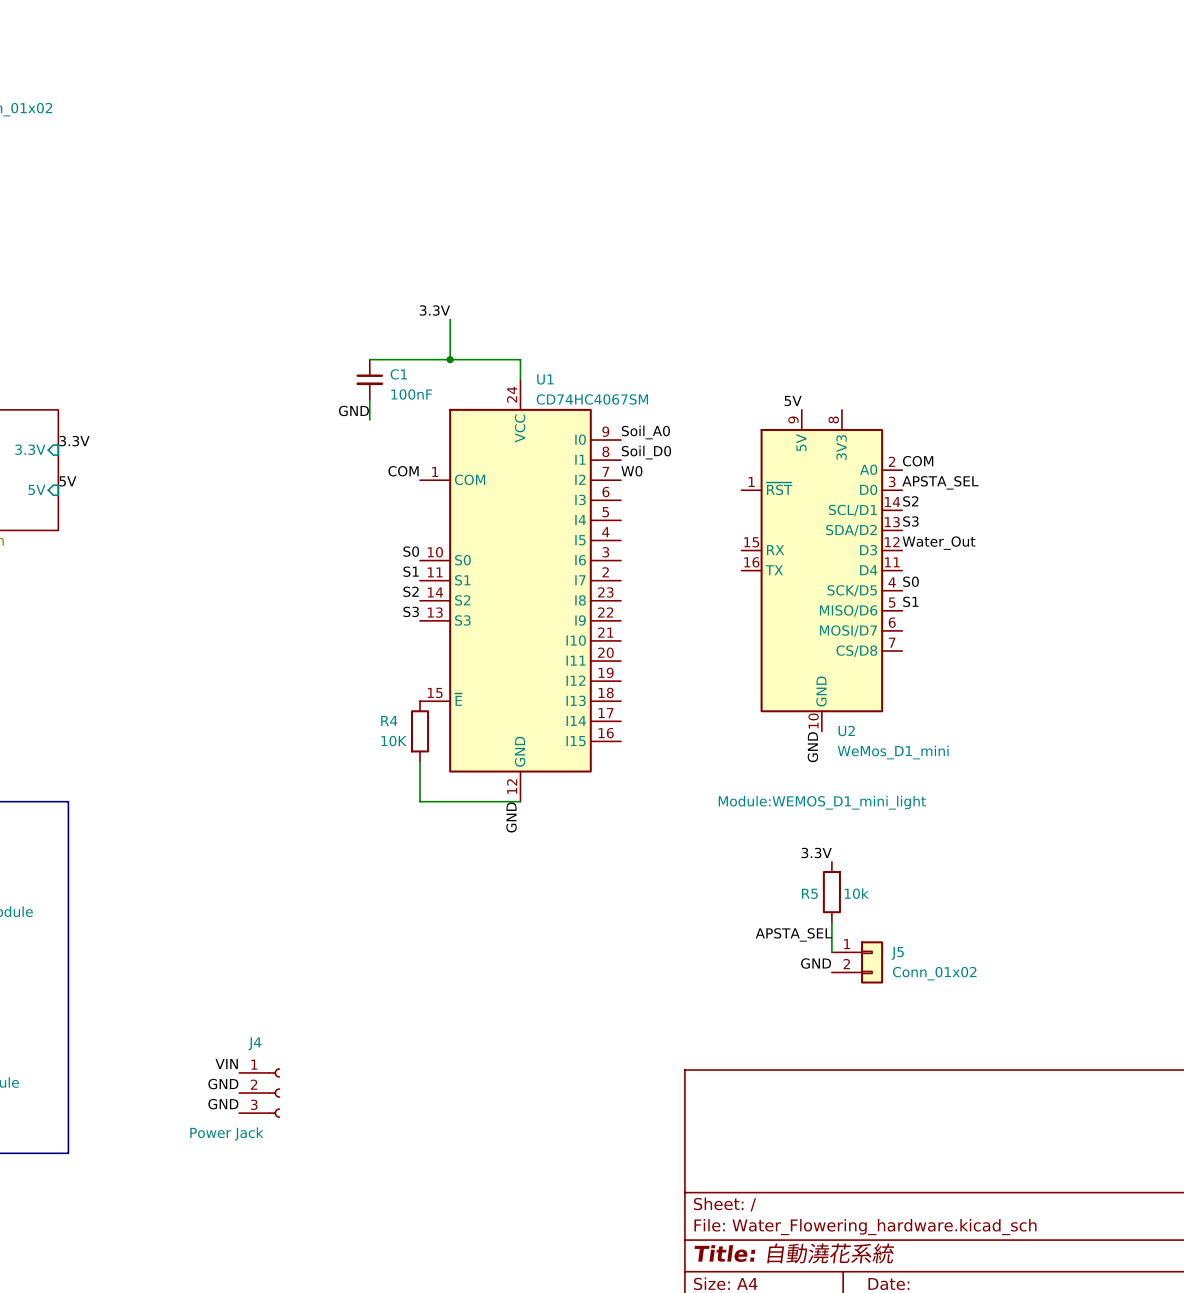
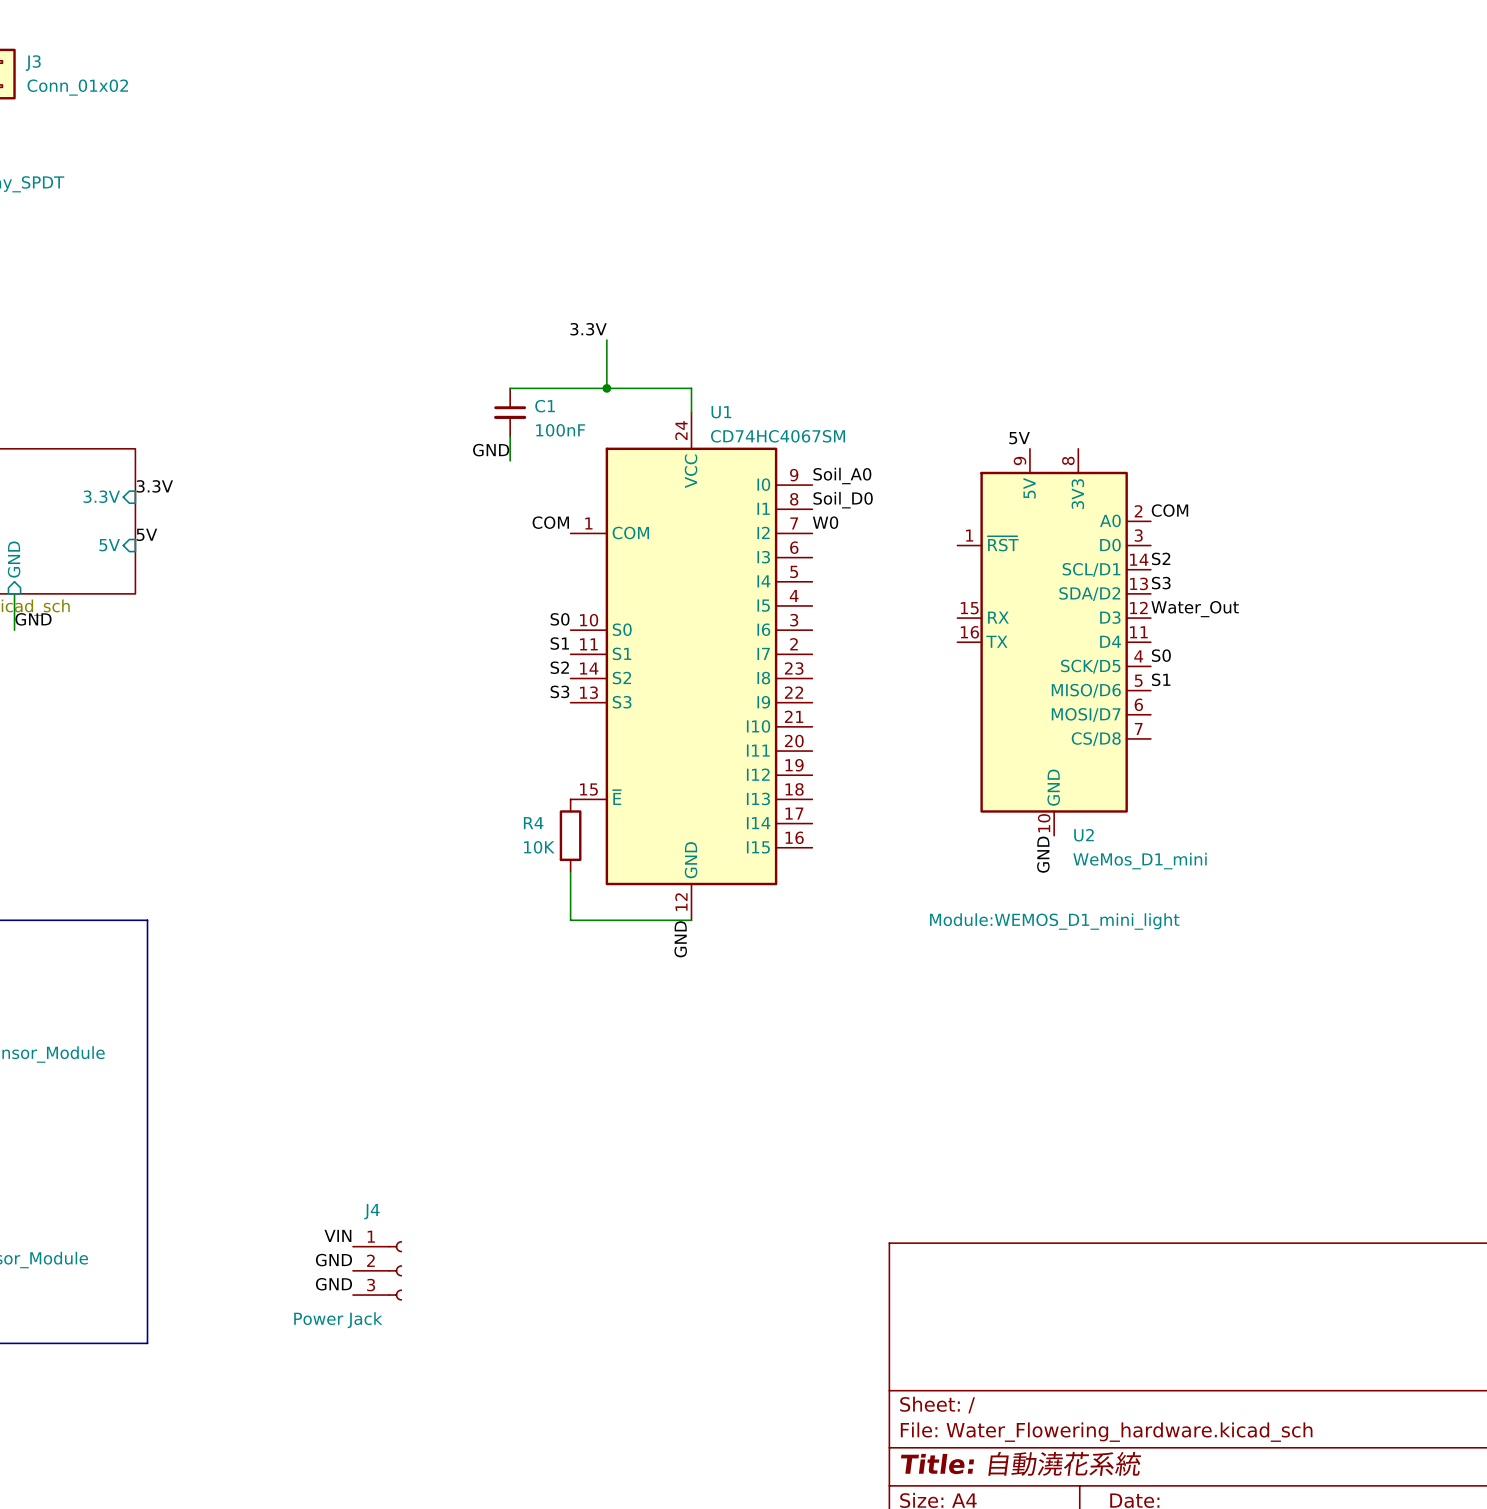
label: APSTA_SEL (940, 482) -> none
label: 3.3V (816, 853) -> none
R5: 10k (831, 892) -> none
wire: (831, 922) (831, 952) -> none
label: APSTA_SEL (793, 934) -> none
J5: Conn_01x02 (857, 962) -> none
label: GND (816, 963) -> none

